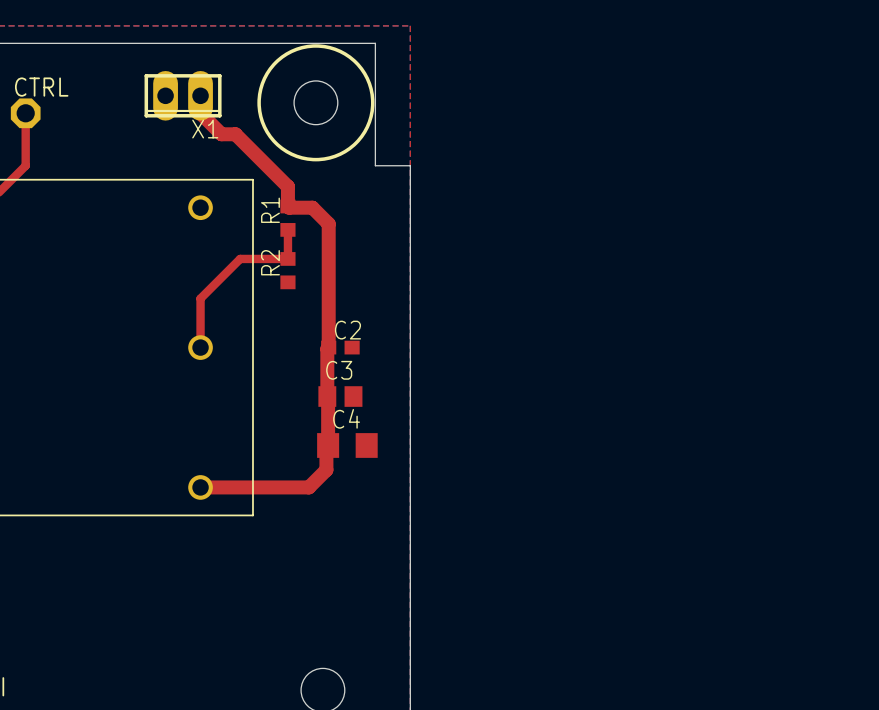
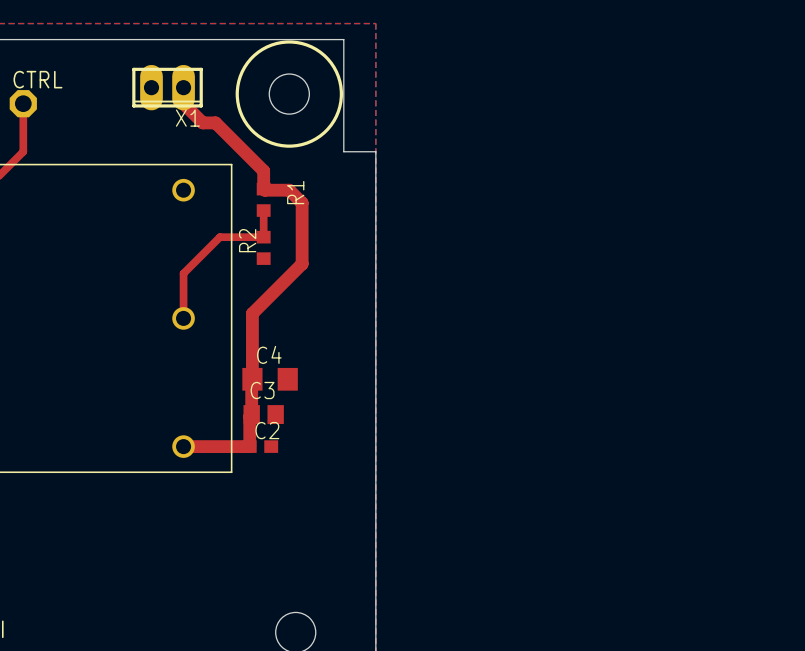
top track: (312, 207) (328, 223) (326, 469) (308, 487) (272, 487) -> (286, 190) (289, 190) (302, 203) (302, 263) (252, 313) (249, 446)
R1 name position: R1 (270, 210) -> R1 (295, 192)
C2 position: (340, 347) -> (260, 446)
C3 position: (340, 396) -> (263, 414)
C4 position: (347, 445) -> (270, 379)

